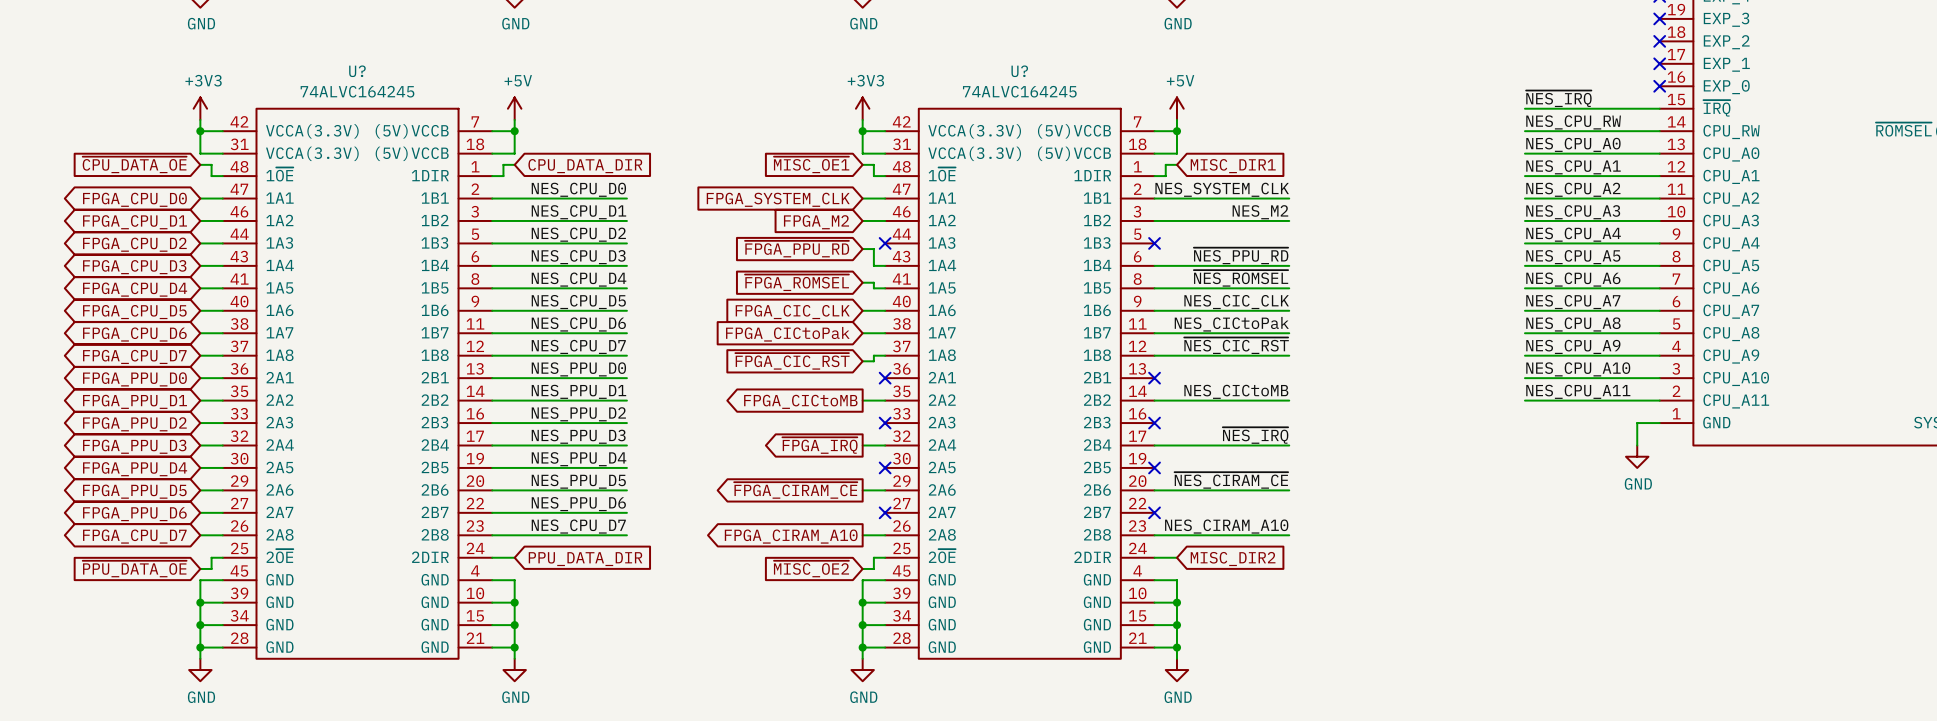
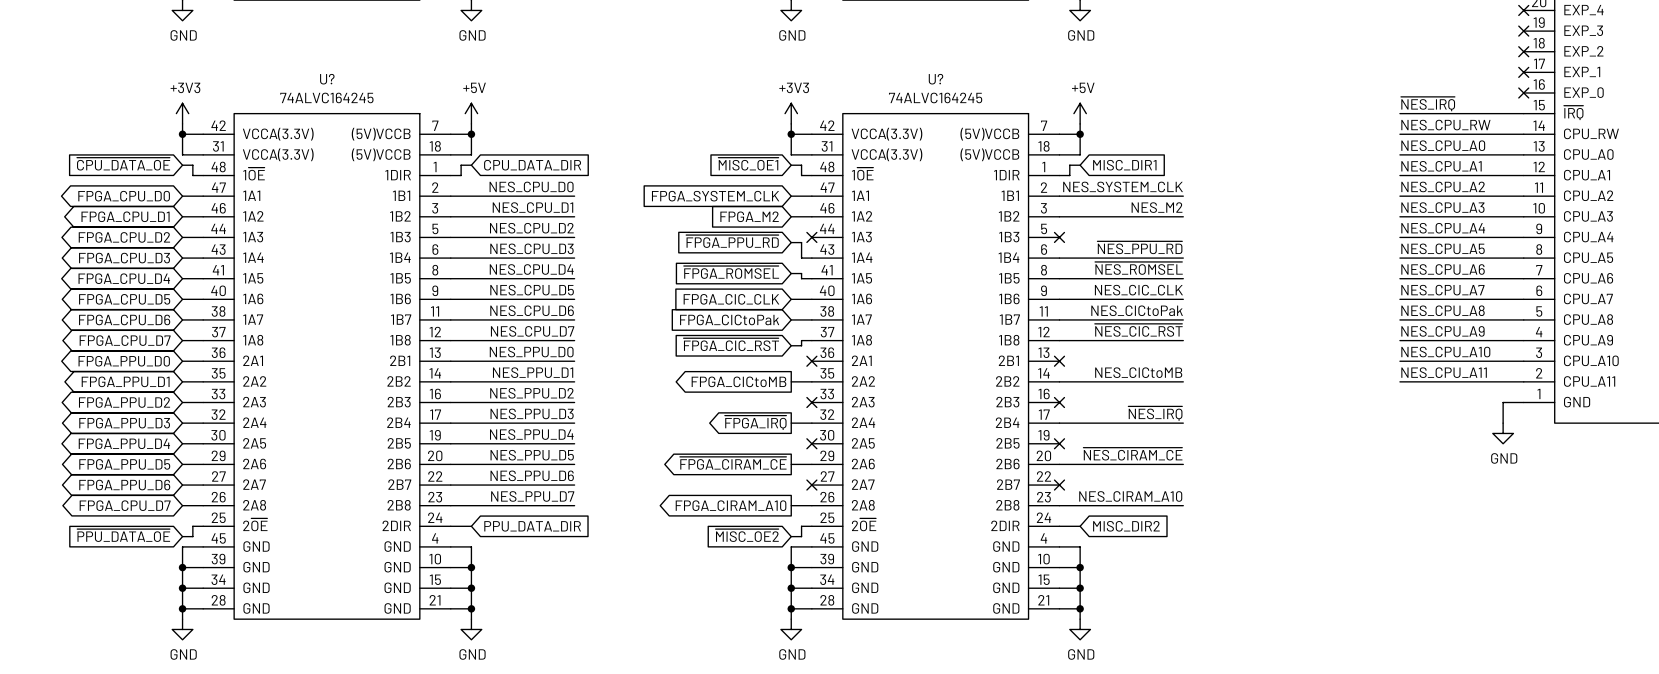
label: NES_CPU_D7 (578, 526) -> NES_PPU_D7 (532, 496)

